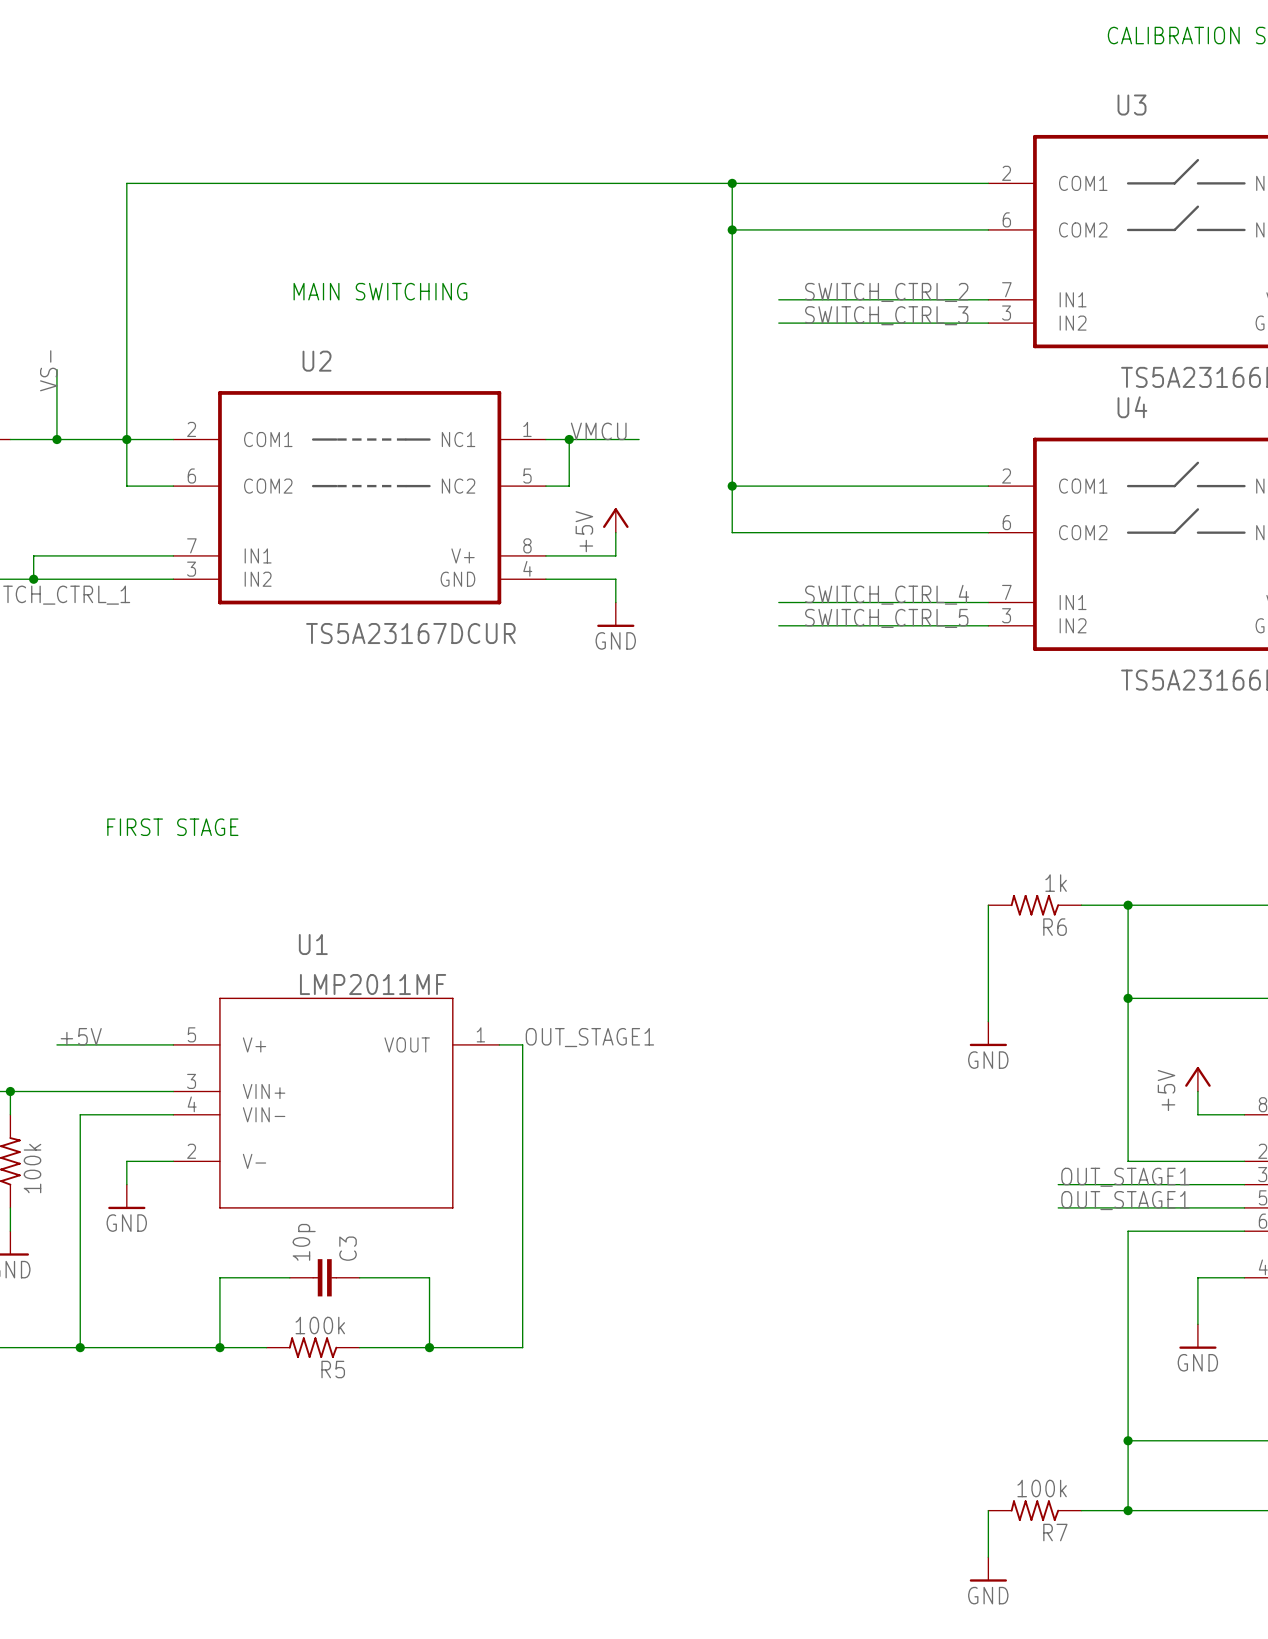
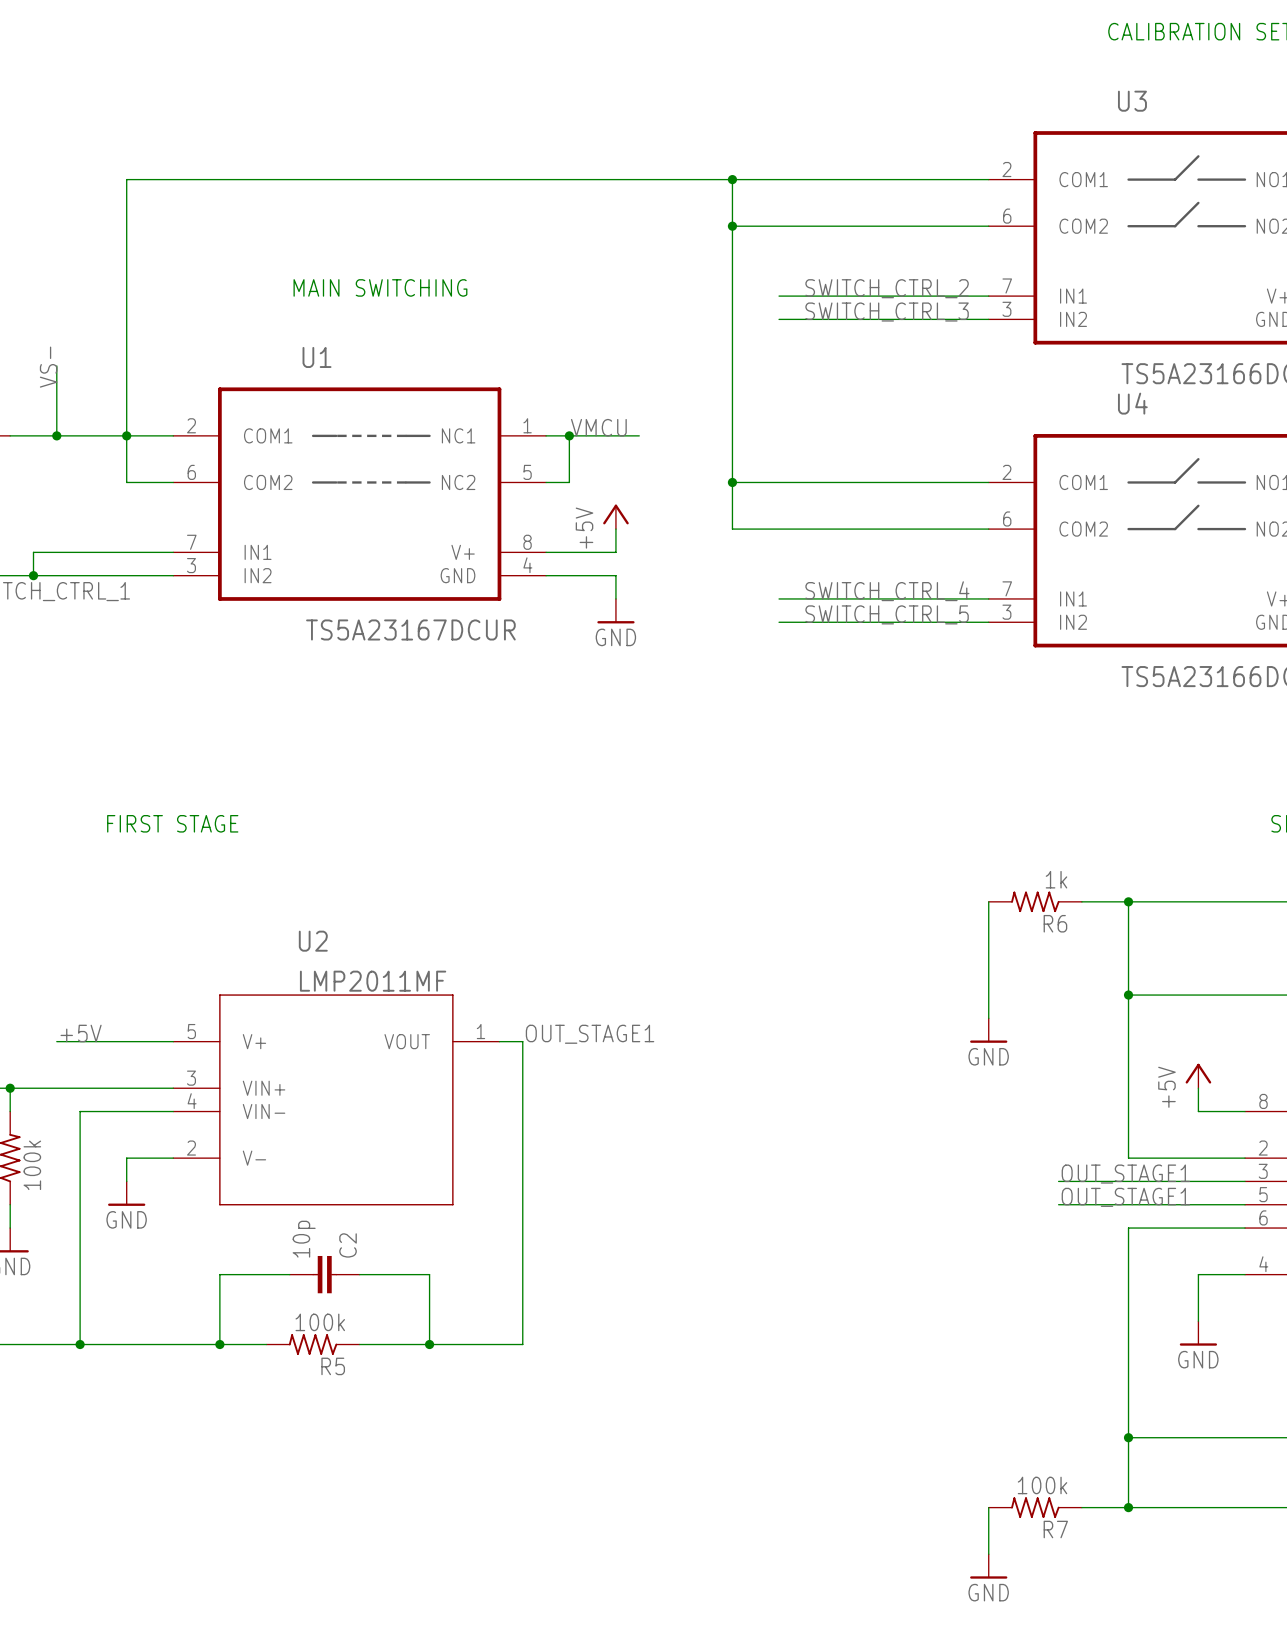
U2 name: U2 (317, 361) -> U1 (317, 357)
U1 name: U1 (313, 944) -> U2 (313, 941)
C3 name: C3 (348, 1248) -> C2 (348, 1245)

